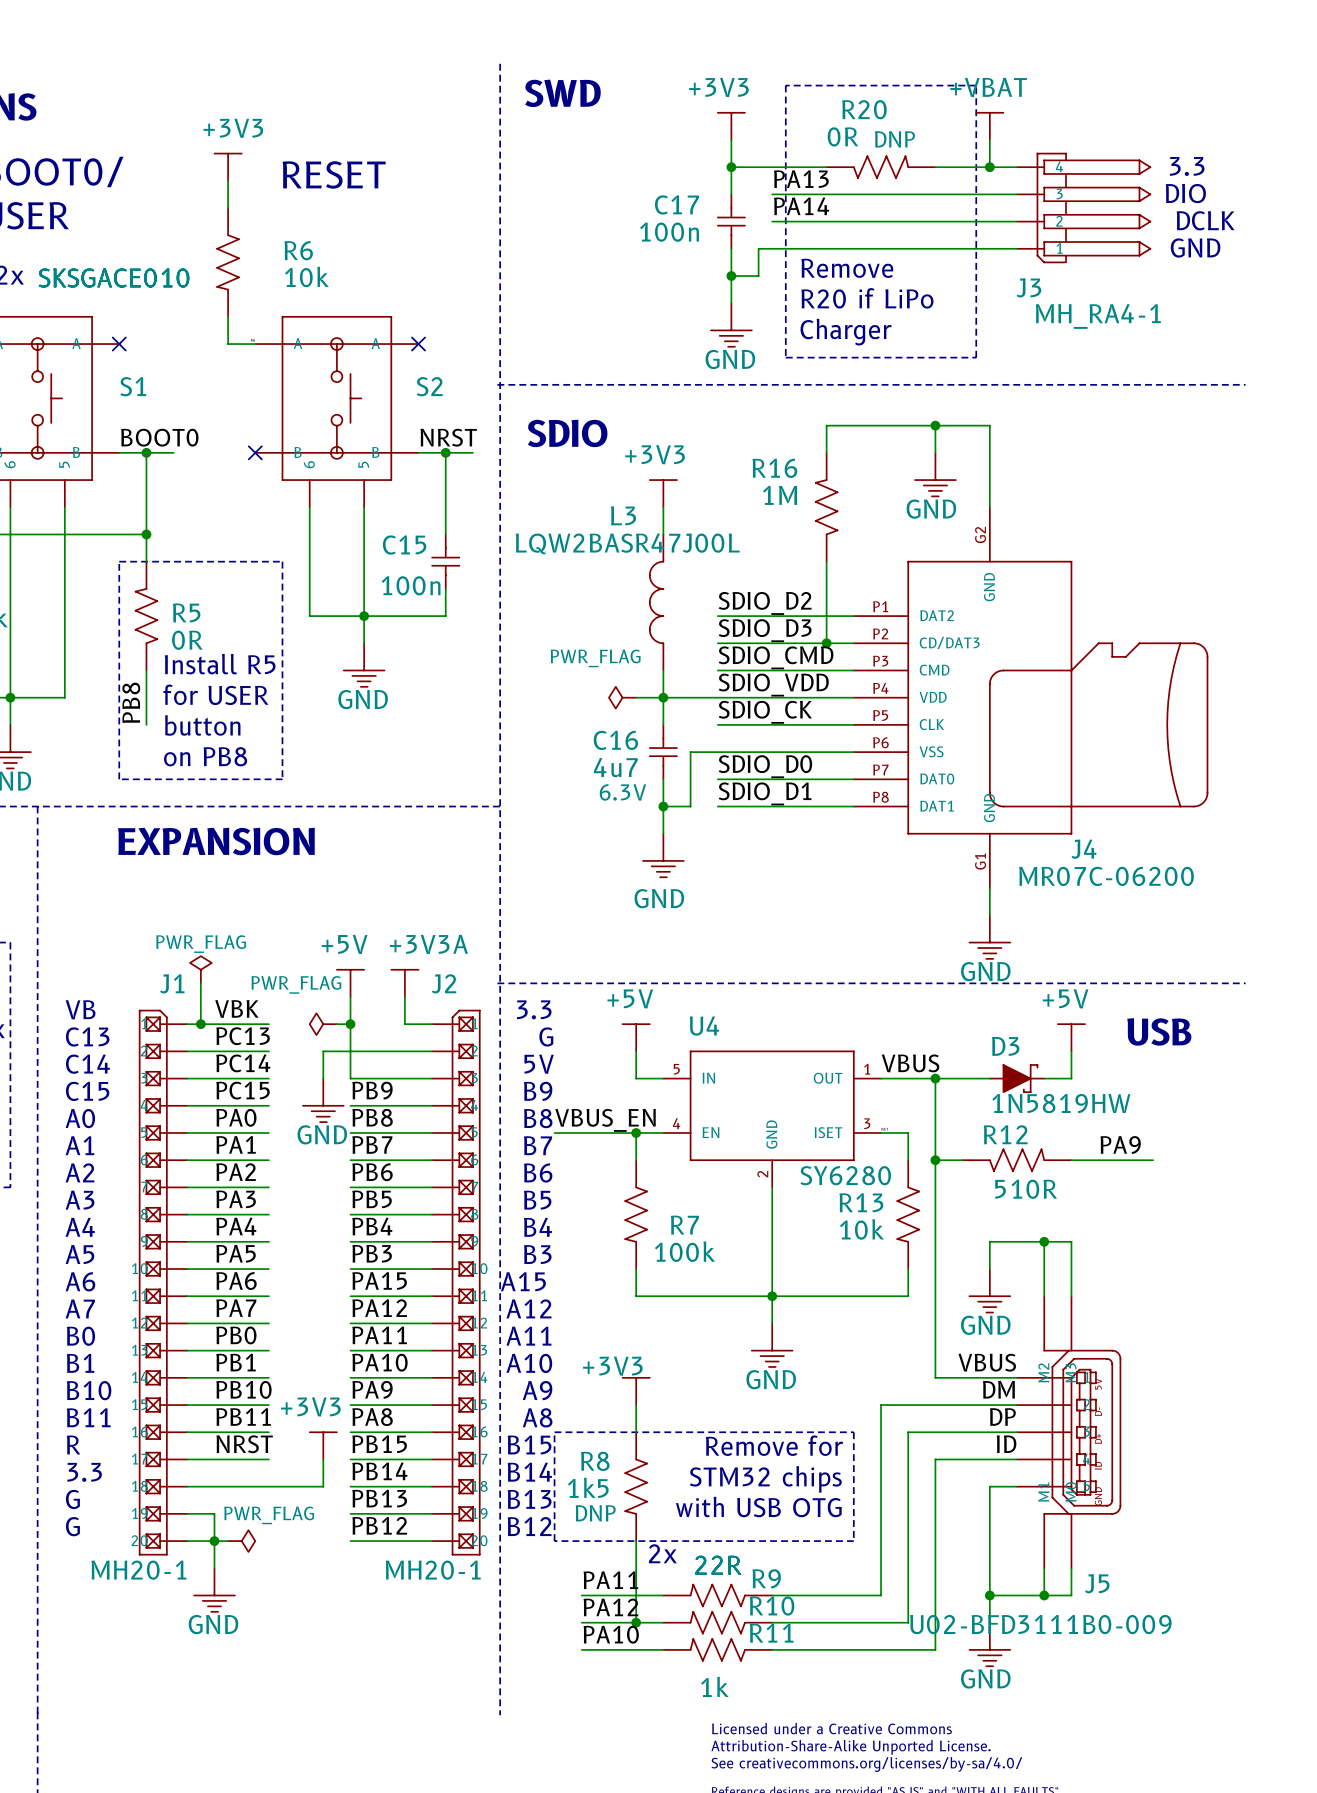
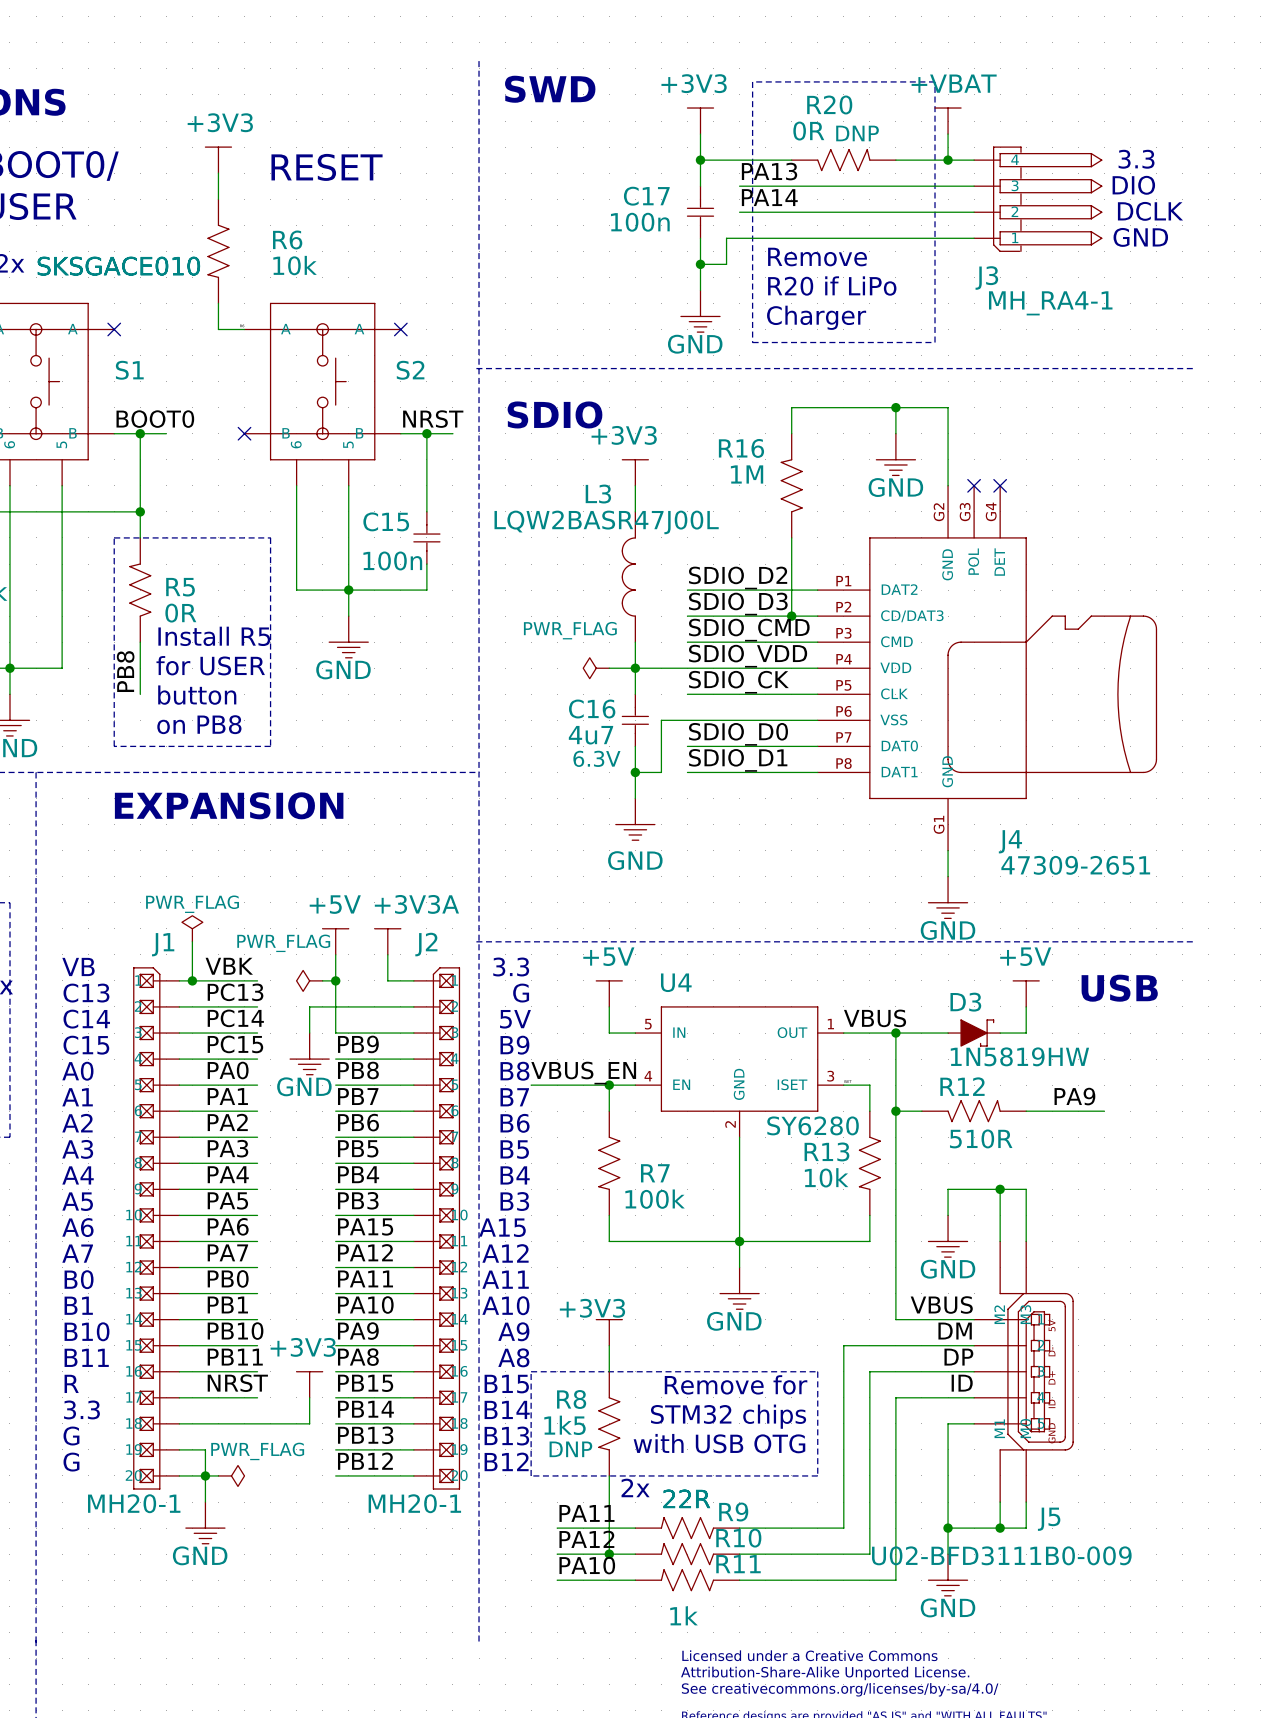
J4 symbol: [853, 507, 1208, 889] -> [817, 485, 1157, 851]
no-connect mark: none -> (974, 485)
no-connect mark: none -> (1000, 485)
J4 name position: J4 (1083, 849) -> J4 (1010, 841)
J4 value: MR07C-06200 (1106, 876) -> 47309-2651 (1075, 865)

